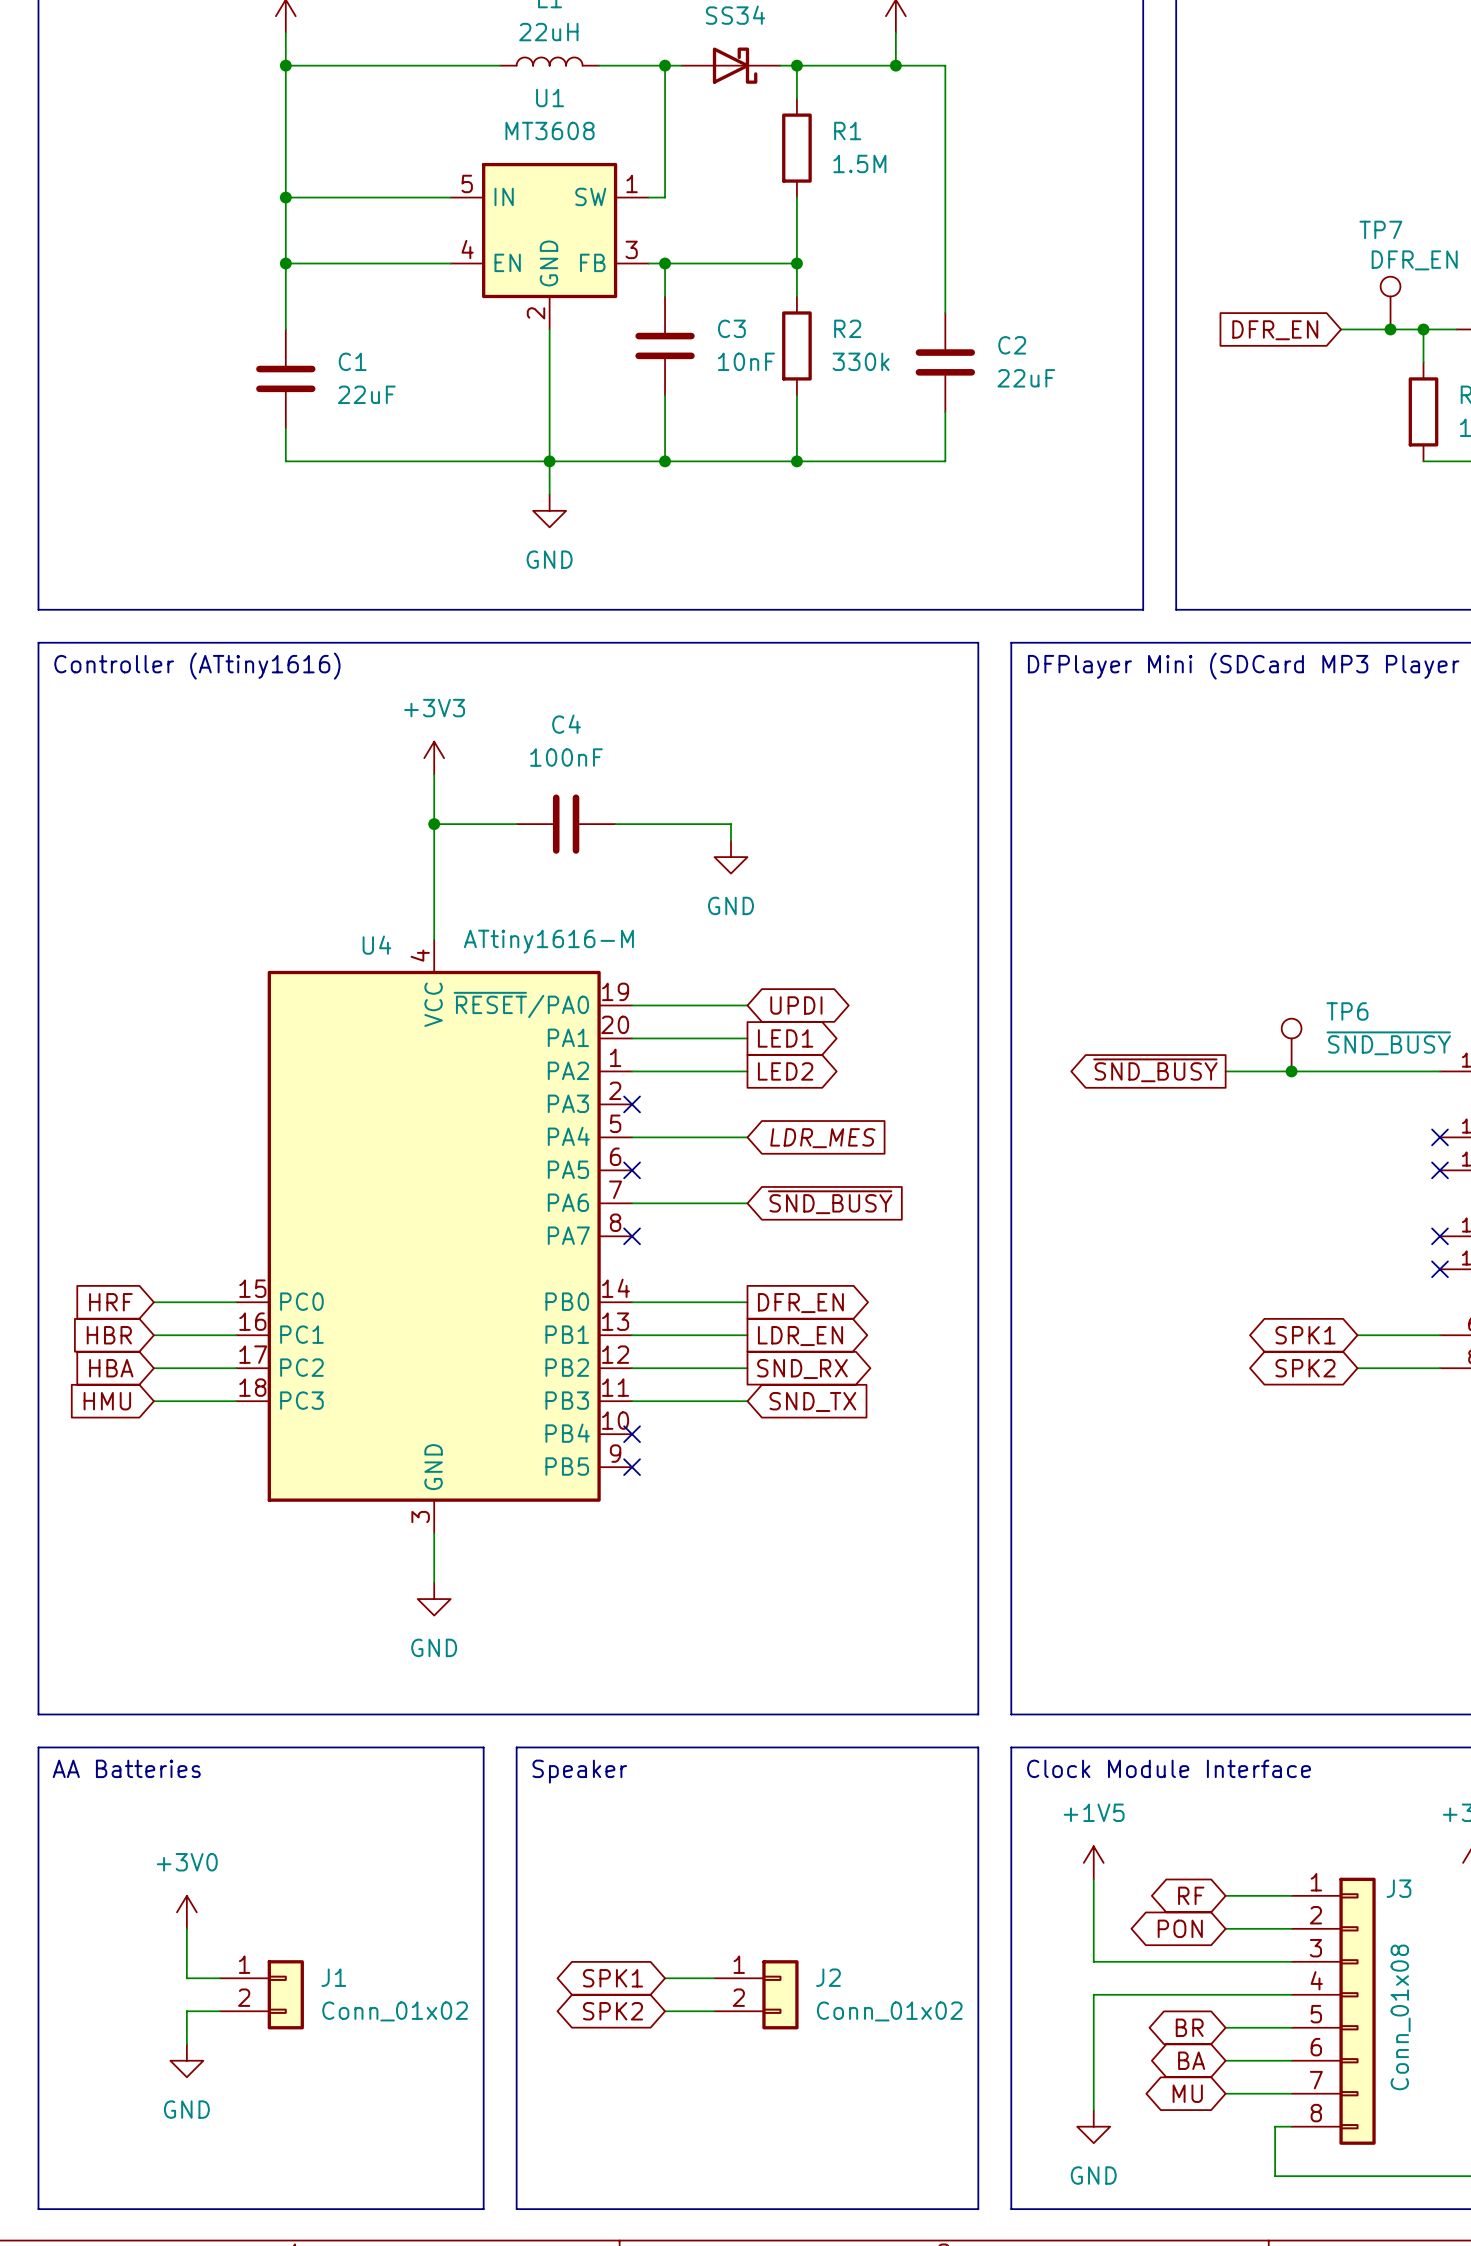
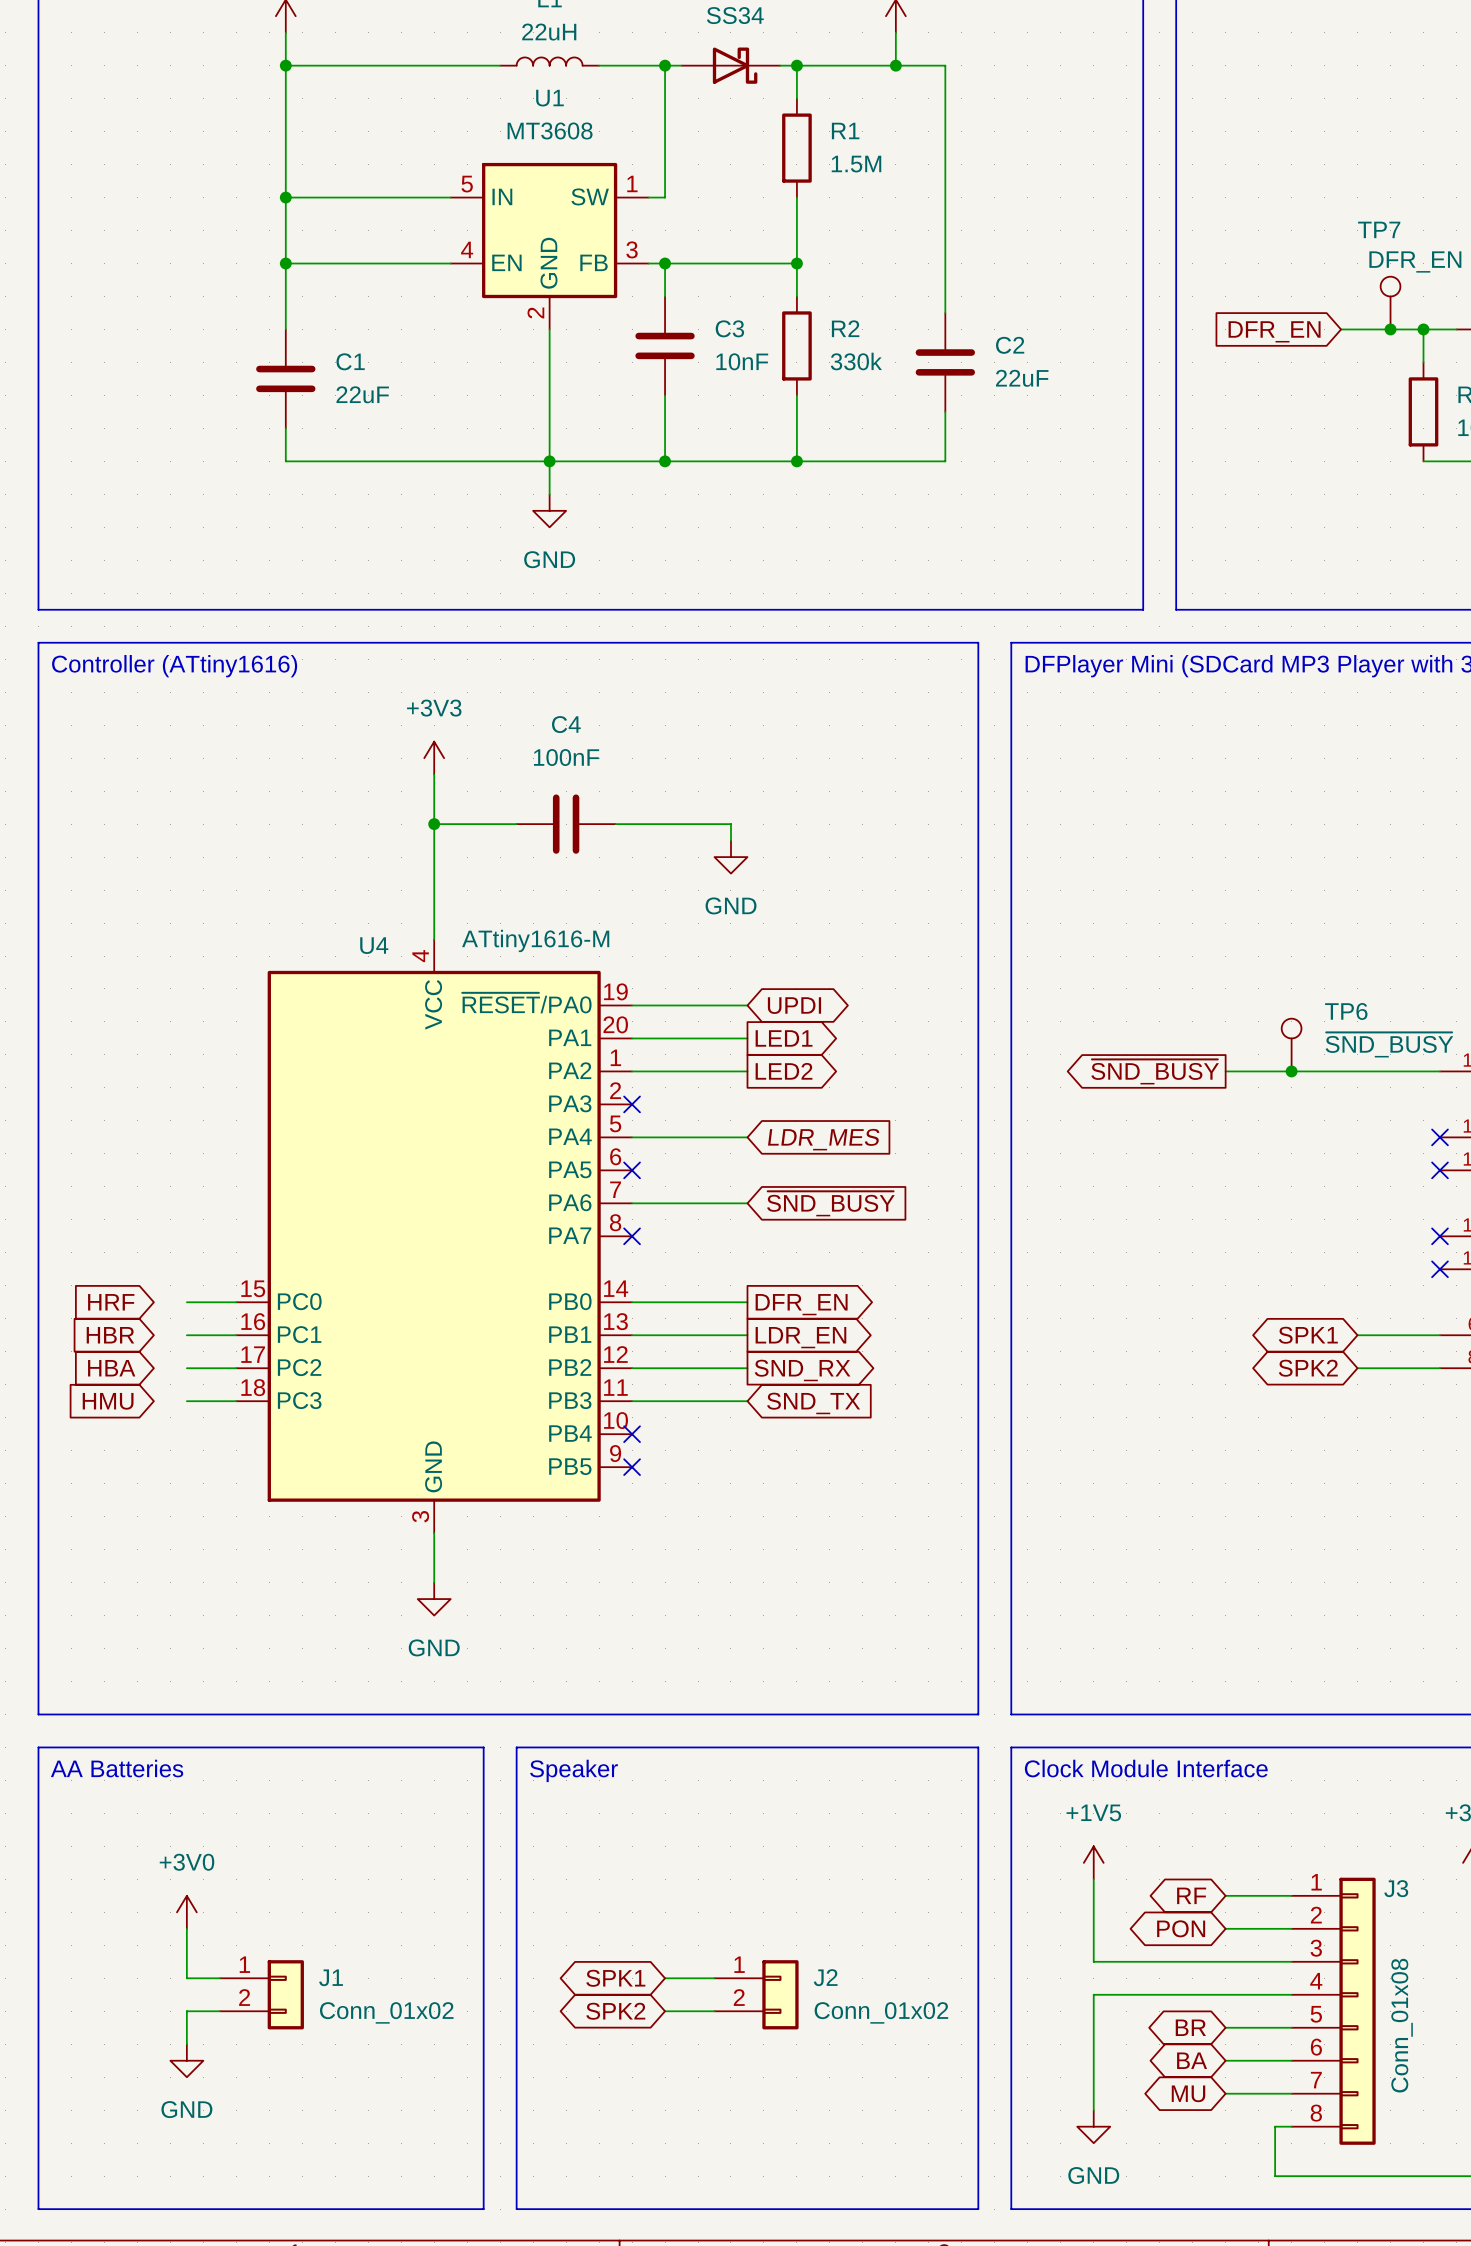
wire: (153, 1302) (186, 1302) -> none
wire: (153, 1335) (186, 1335) -> none
wire: (153, 1368) (186, 1368) -> none
wire: (153, 1401) (186, 1401) -> none

